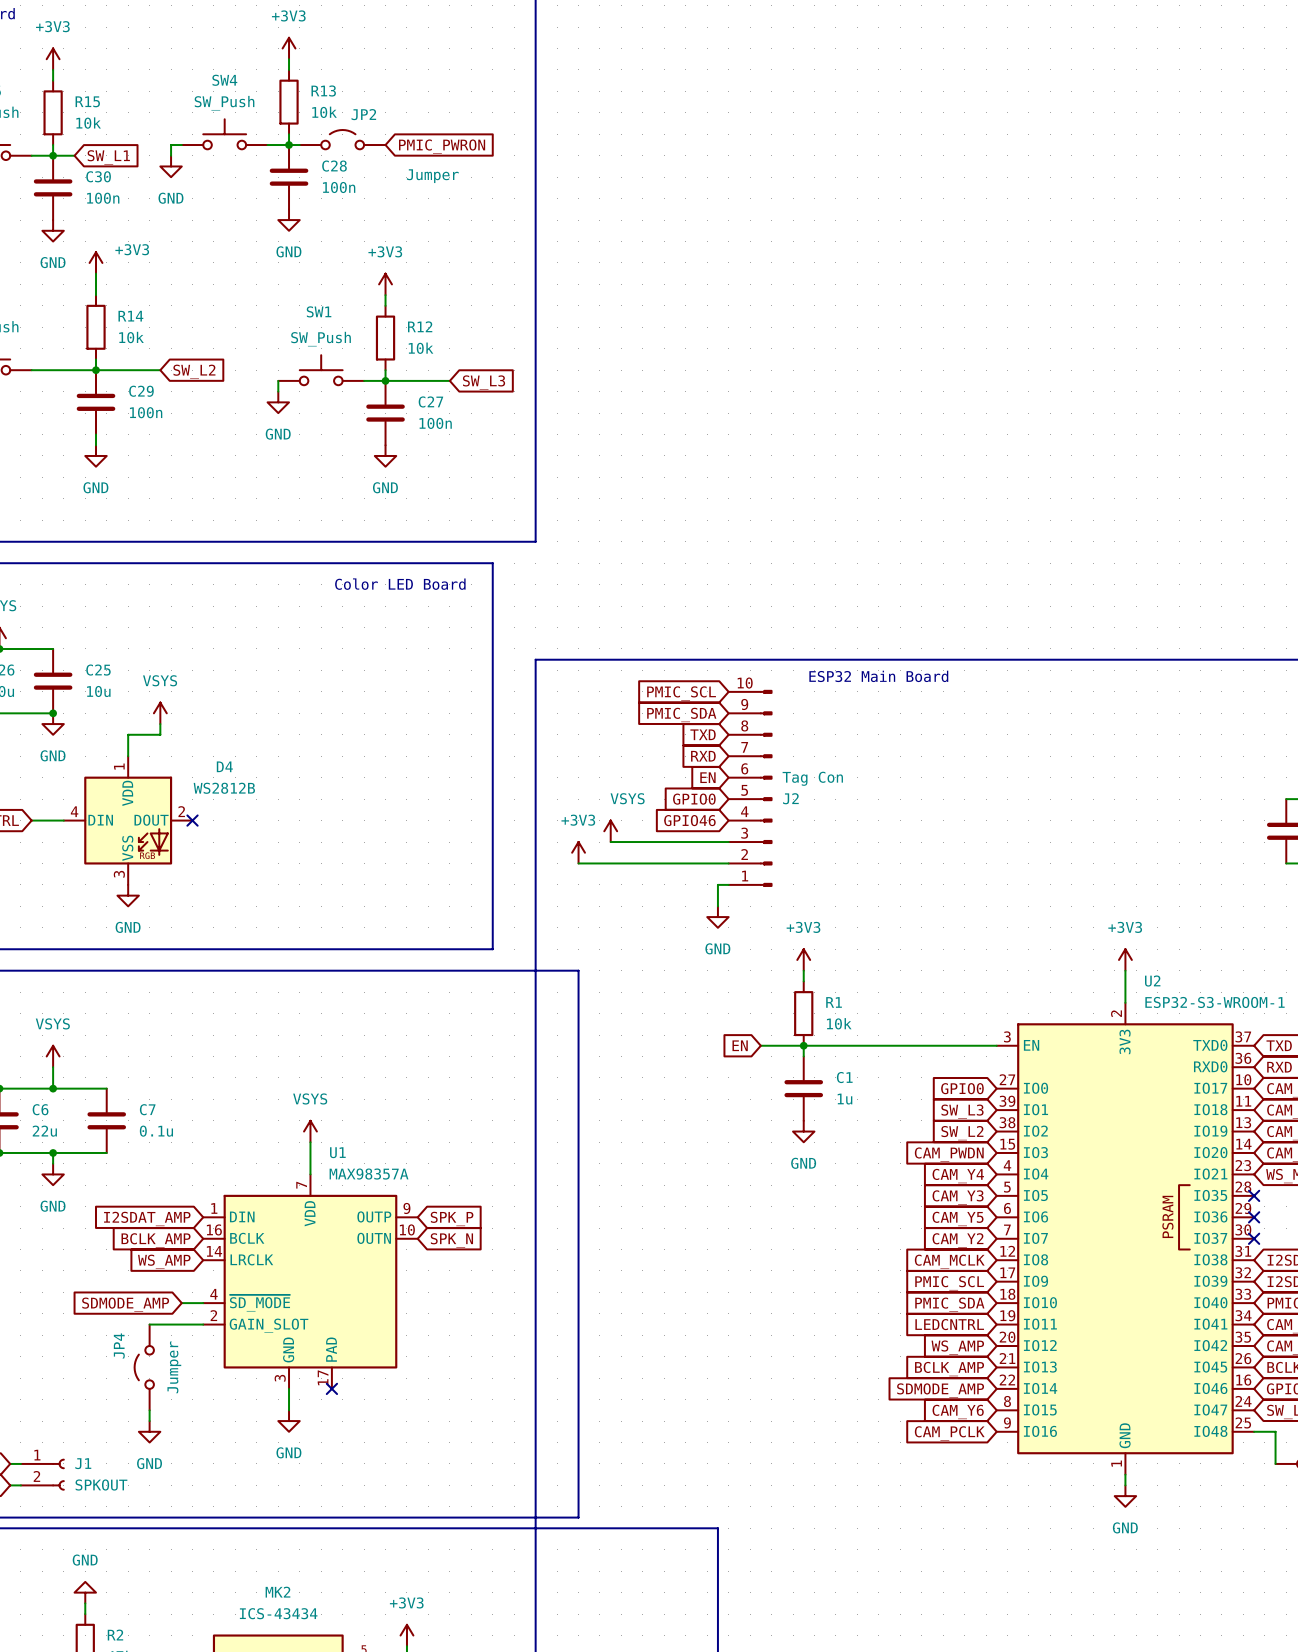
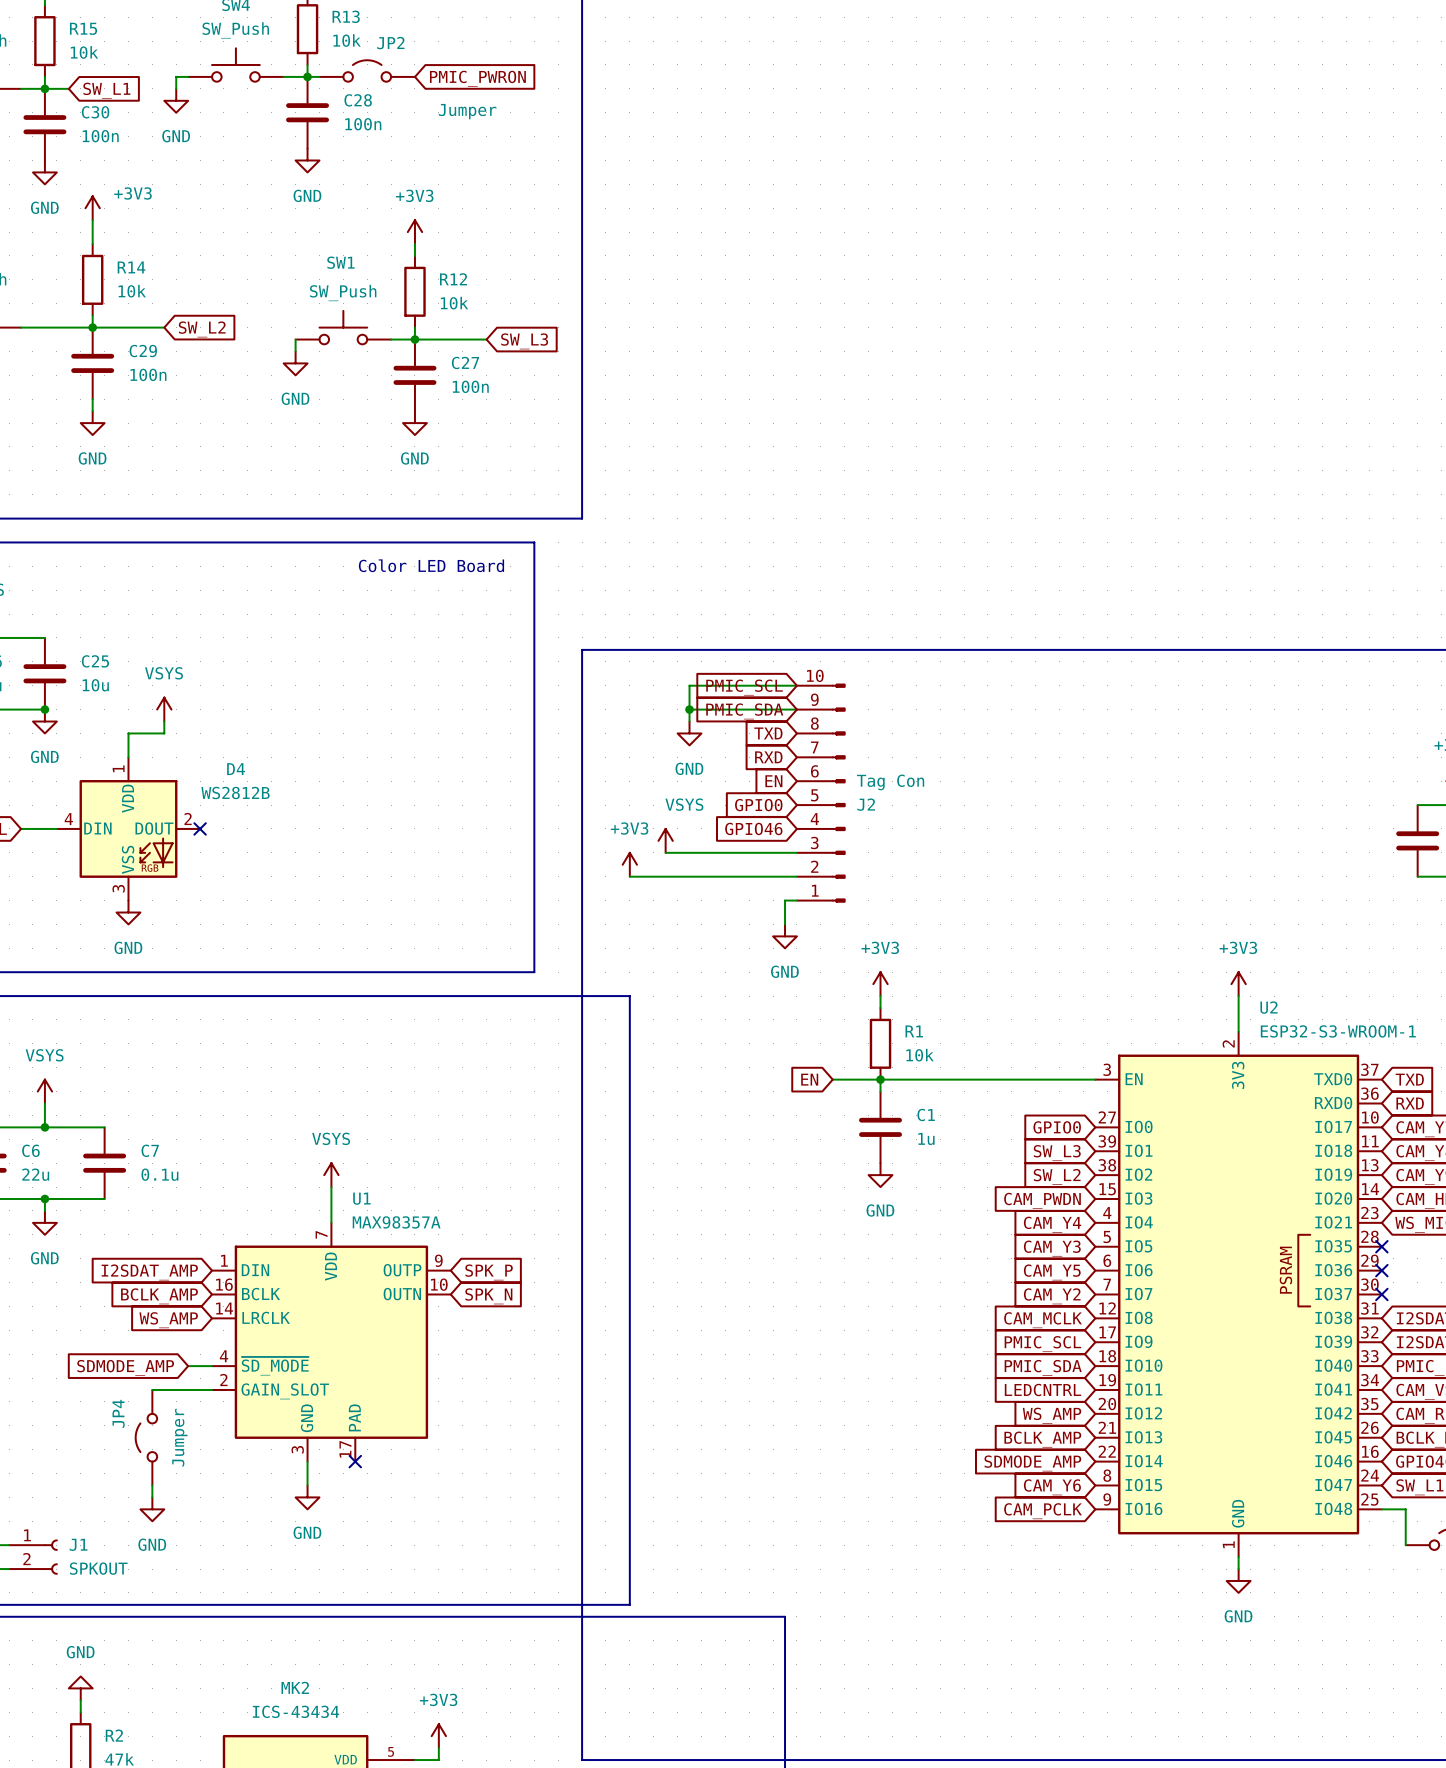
text: ESP32 Main Board (878, 676) -> none
wire: none -> (796, 685) (689, 685) (689, 721)
wire: none -> (689, 709) (796, 709)
junction: none -> (689, 709)
power symbol: none -> GND (689, 733)

